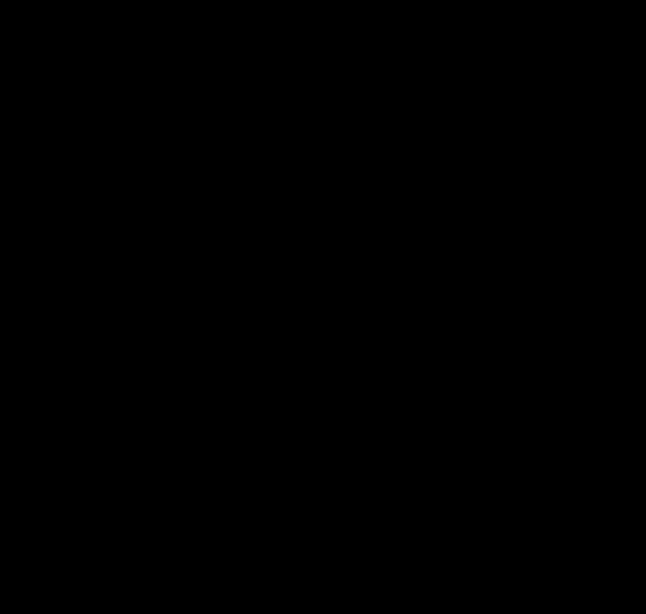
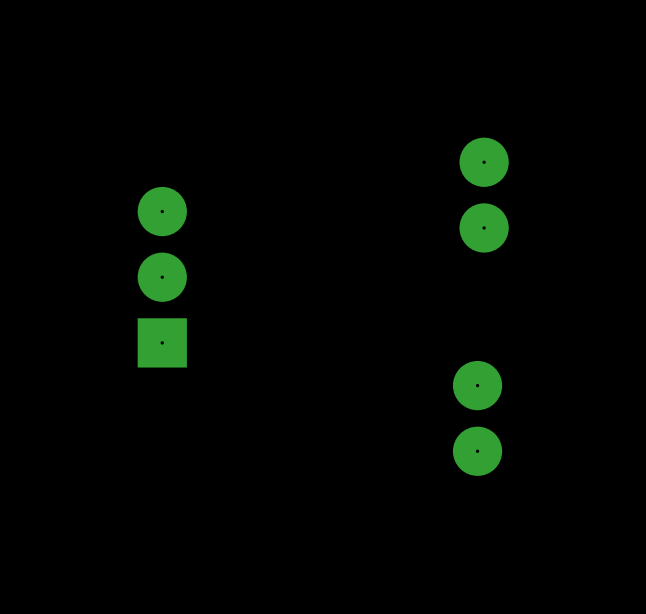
part: none -> (484, 195)
part: none -> (162, 277)
part: none -> (477, 418)

